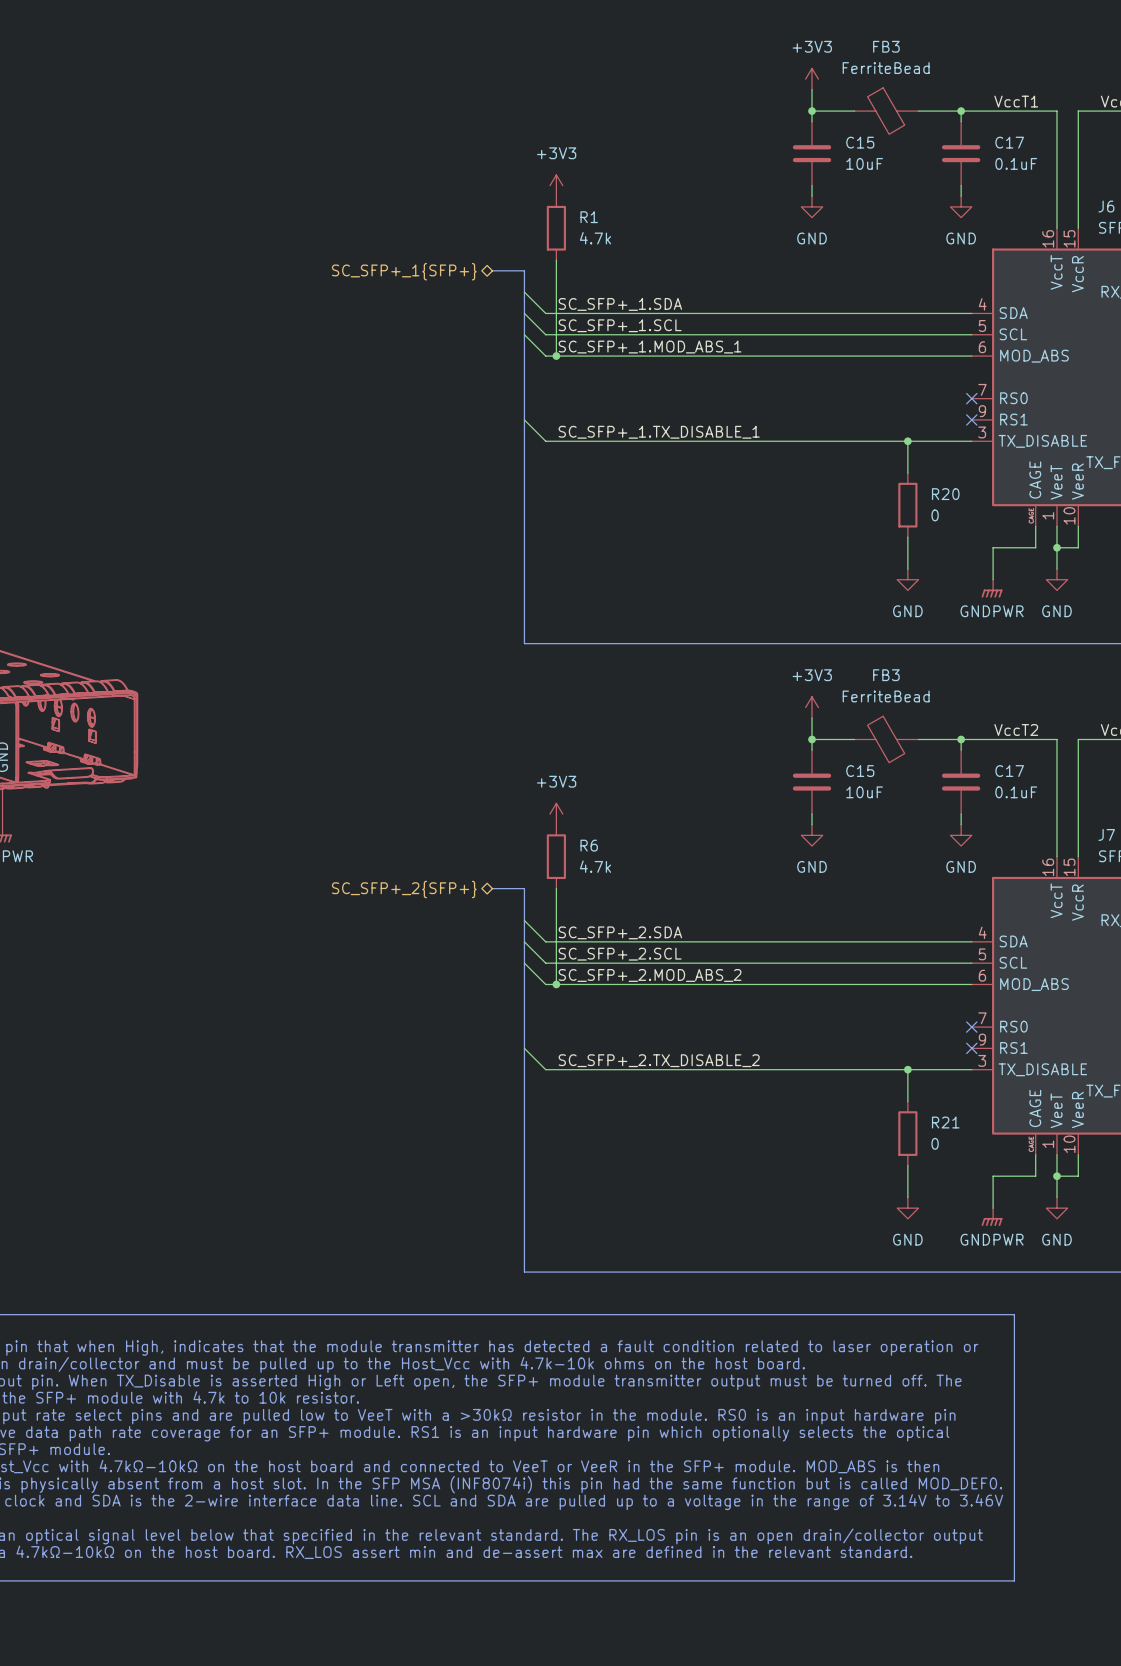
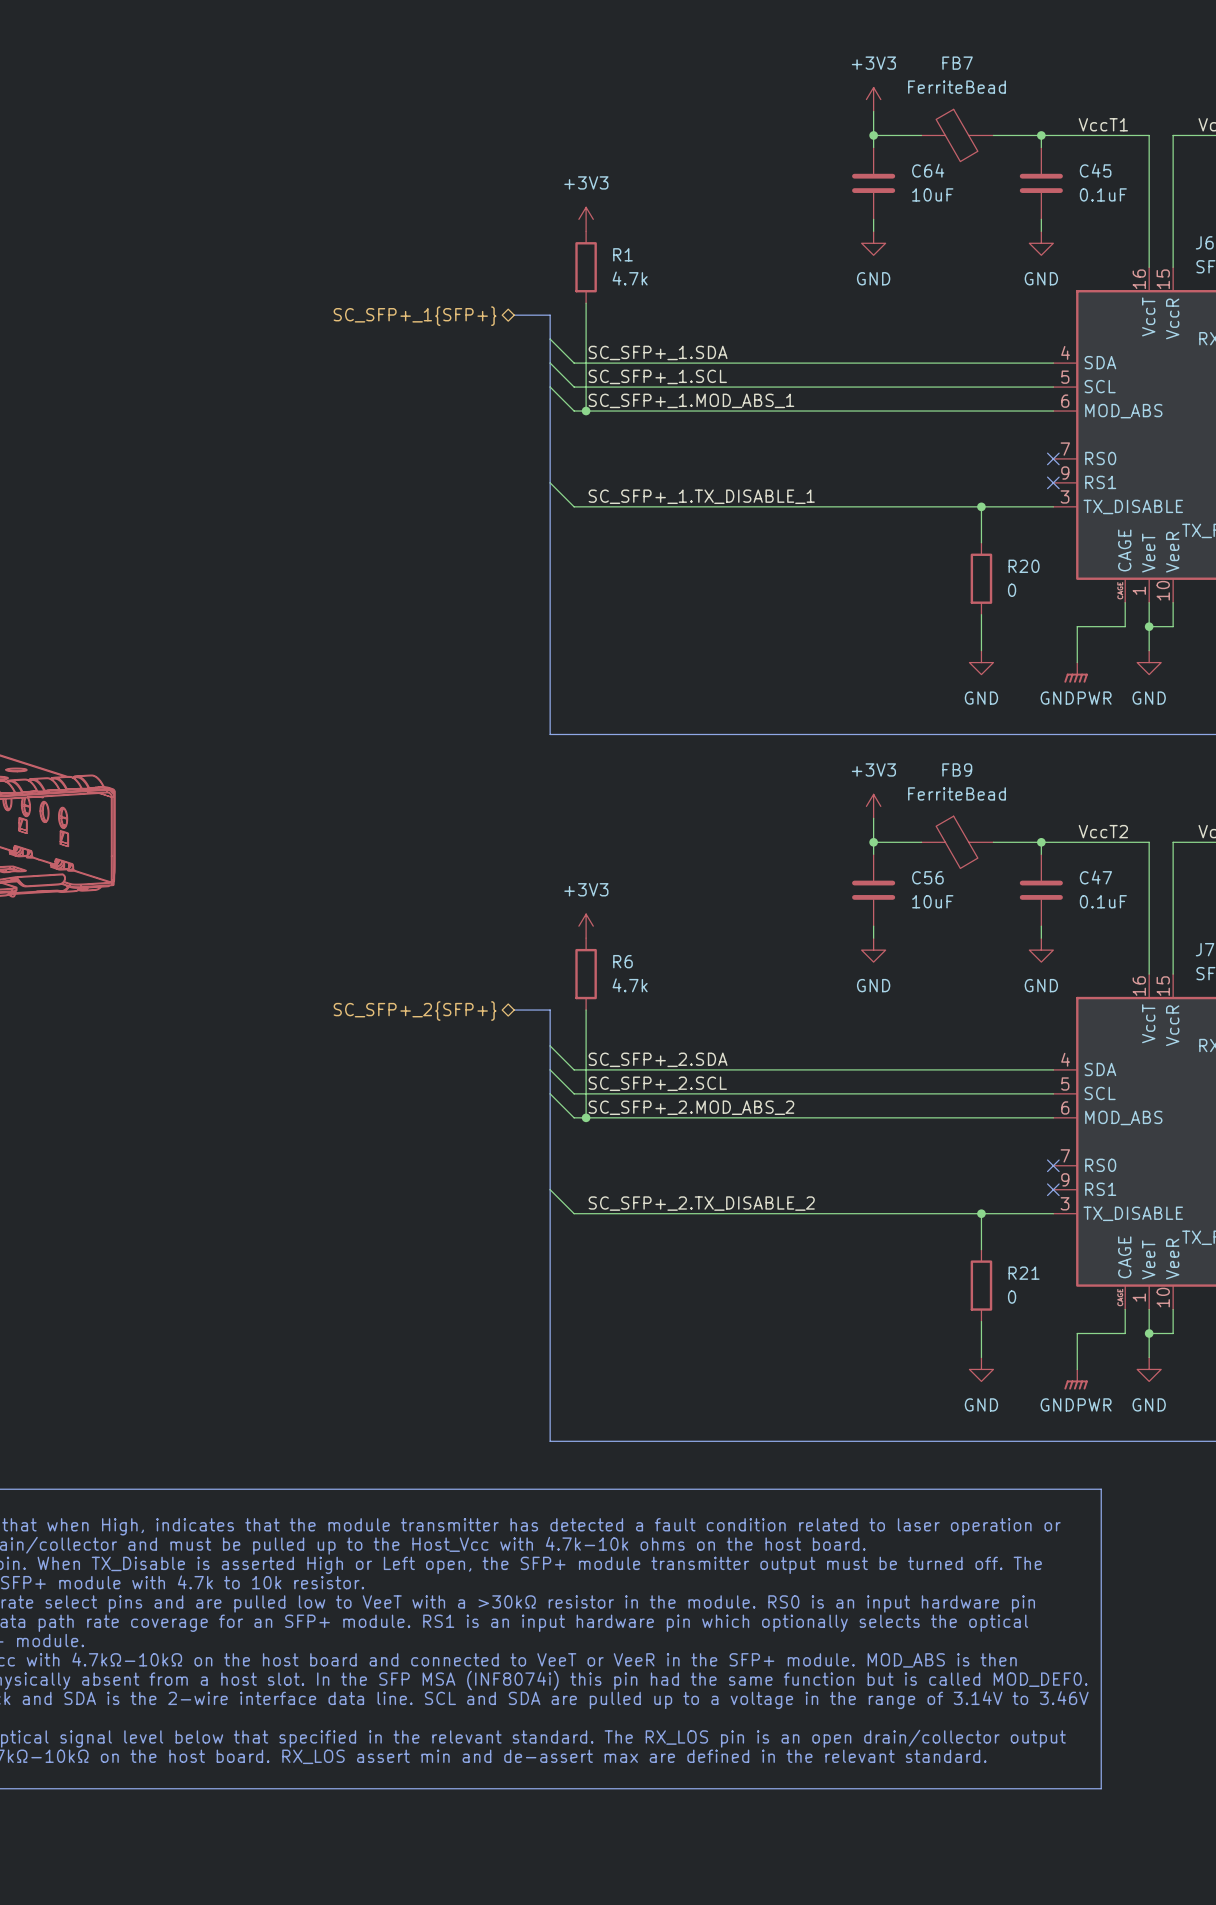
FB3 name: FB3 (886, 46) -> FB7 (957, 63)
C15 name: C15 (860, 142) -> C64 (928, 170)
C17 name: C17 (1009, 142) -> C45 (1095, 170)
FB3 name: FB3 (886, 675) -> FB9 (957, 769)
C15 name: C15 (860, 771) -> C56 (927, 877)
C17 name: C17 (1009, 771) -> C47 (1095, 877)

